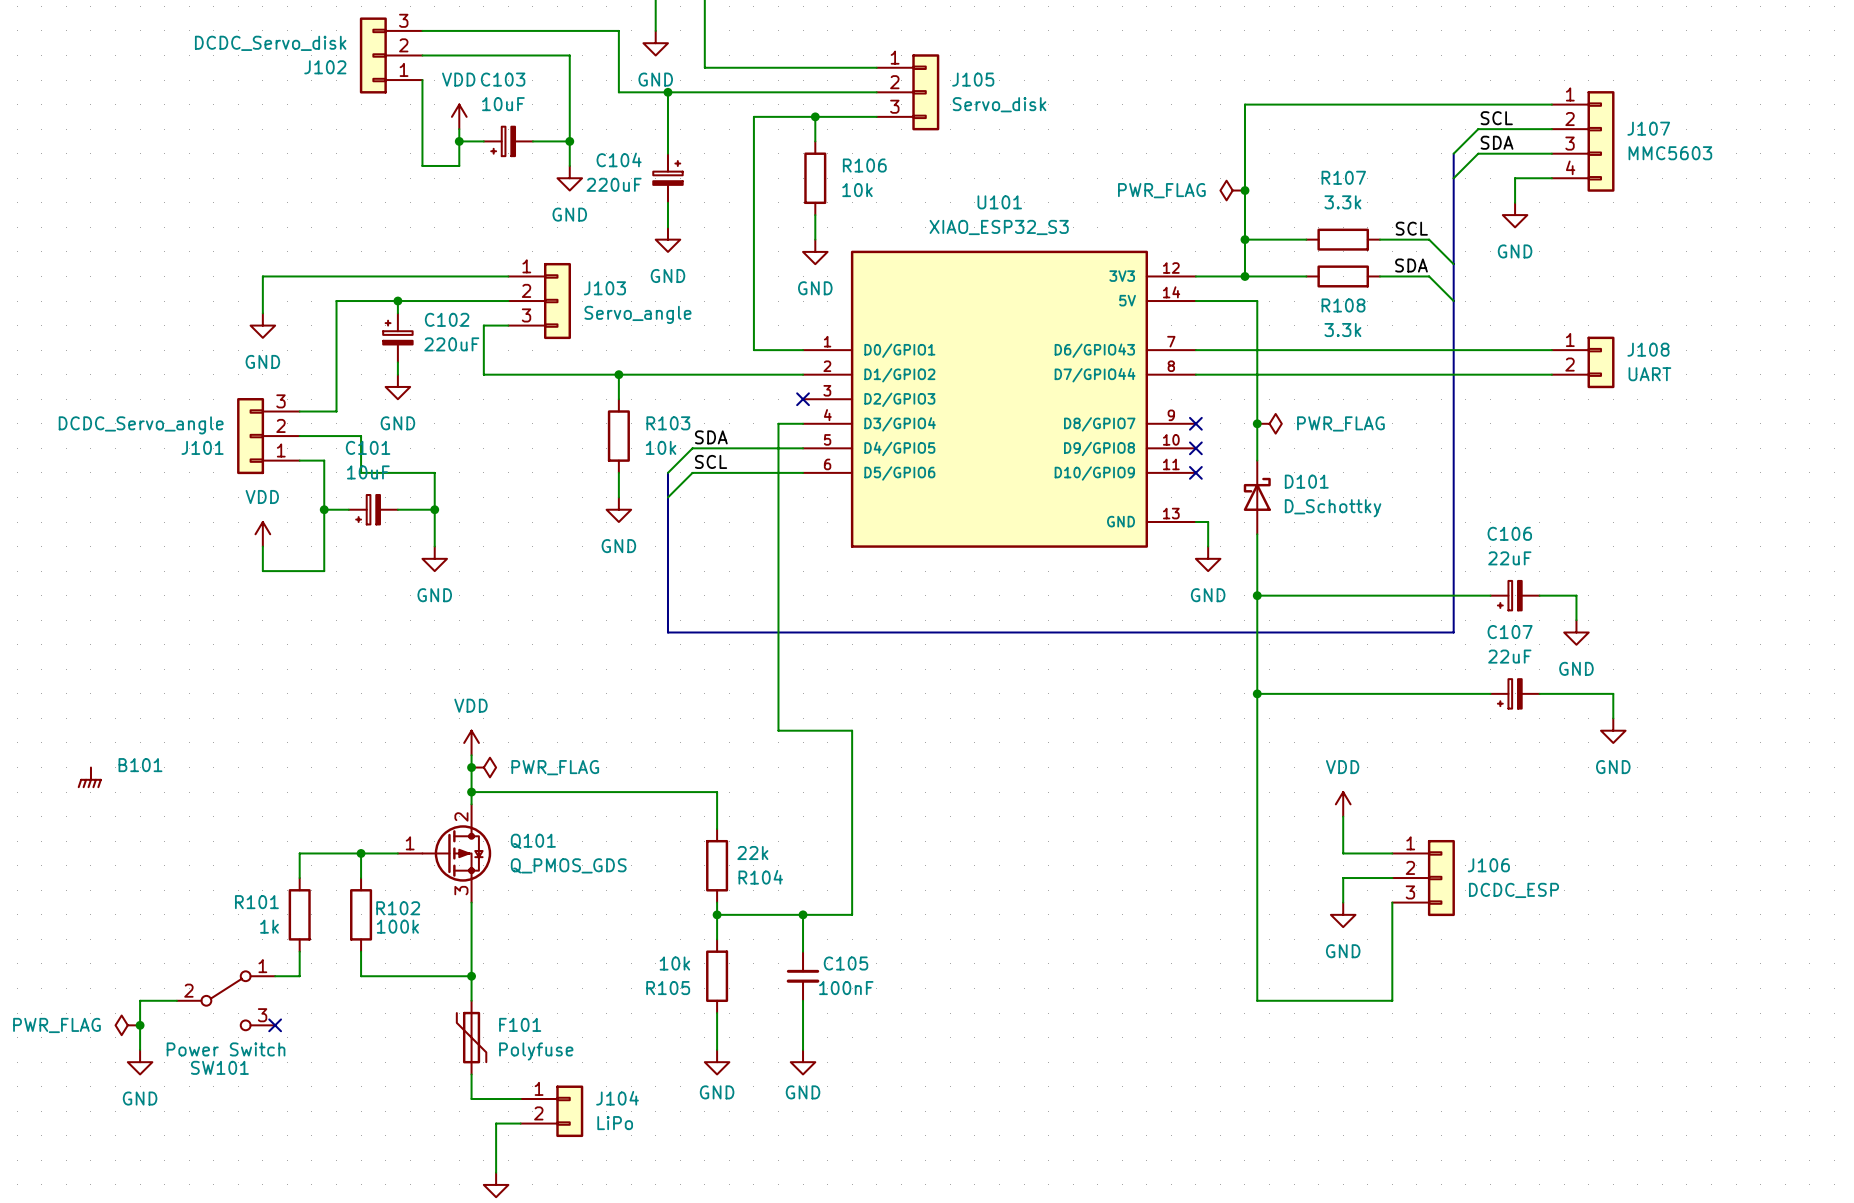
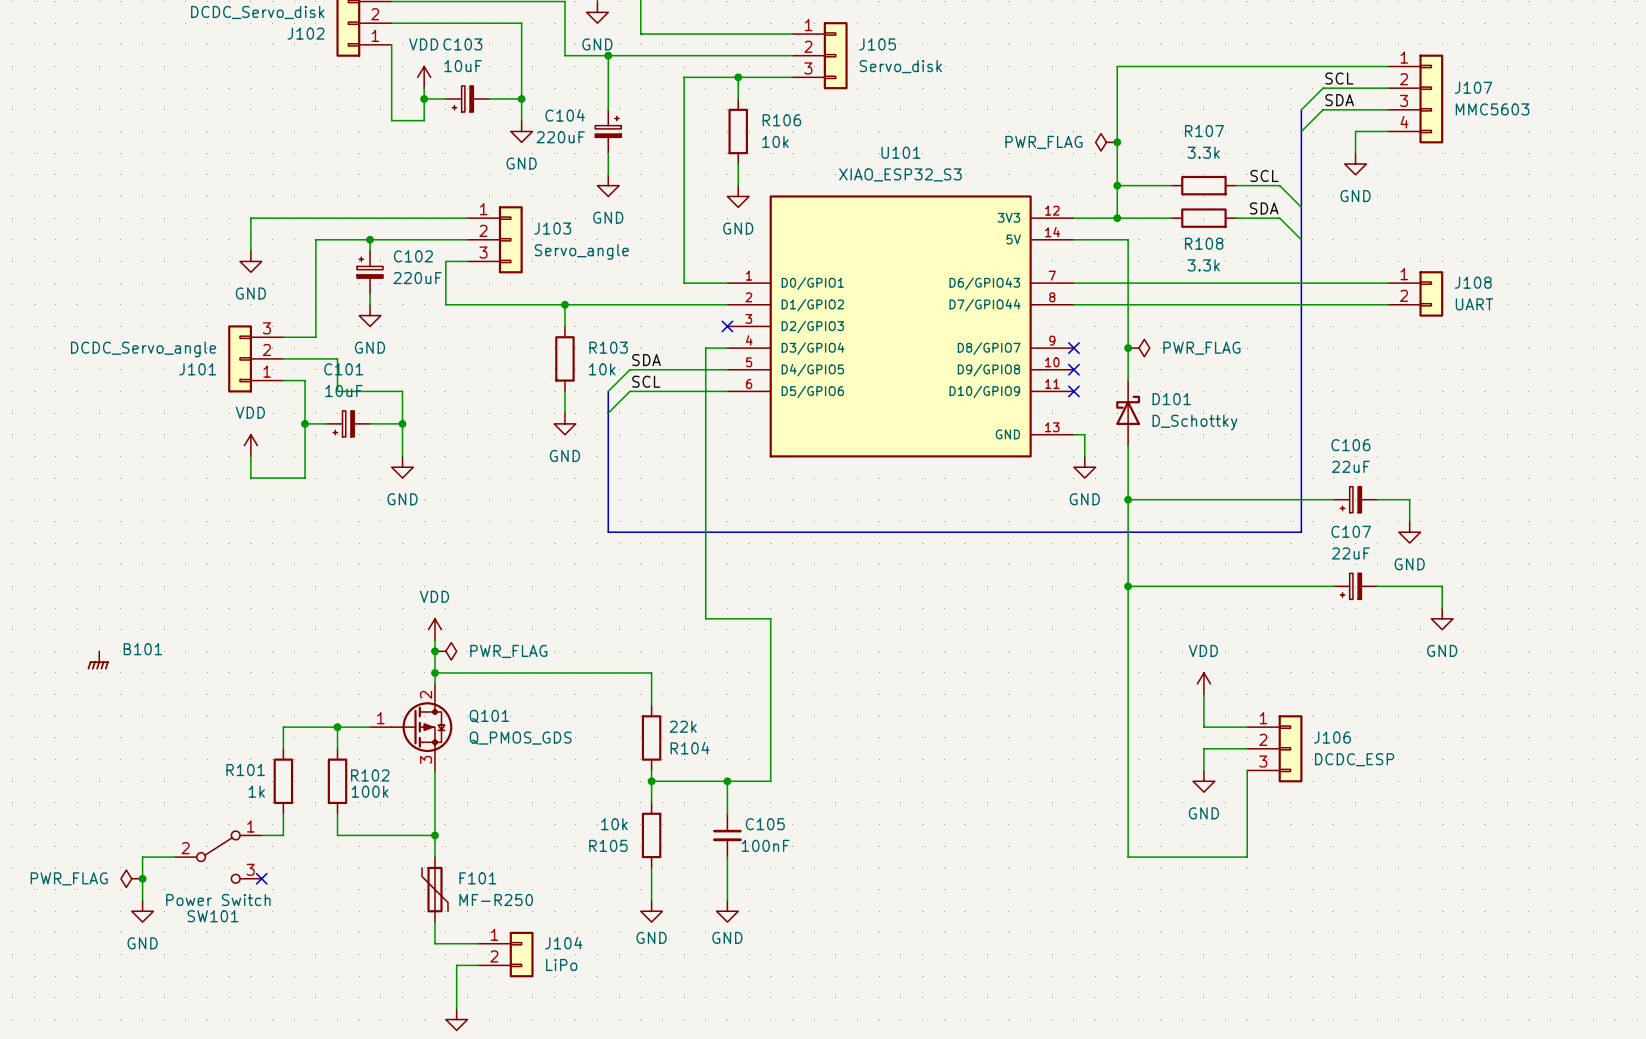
F101 value: Polyfuse (536, 1051) -> MF-R250 (496, 900)

